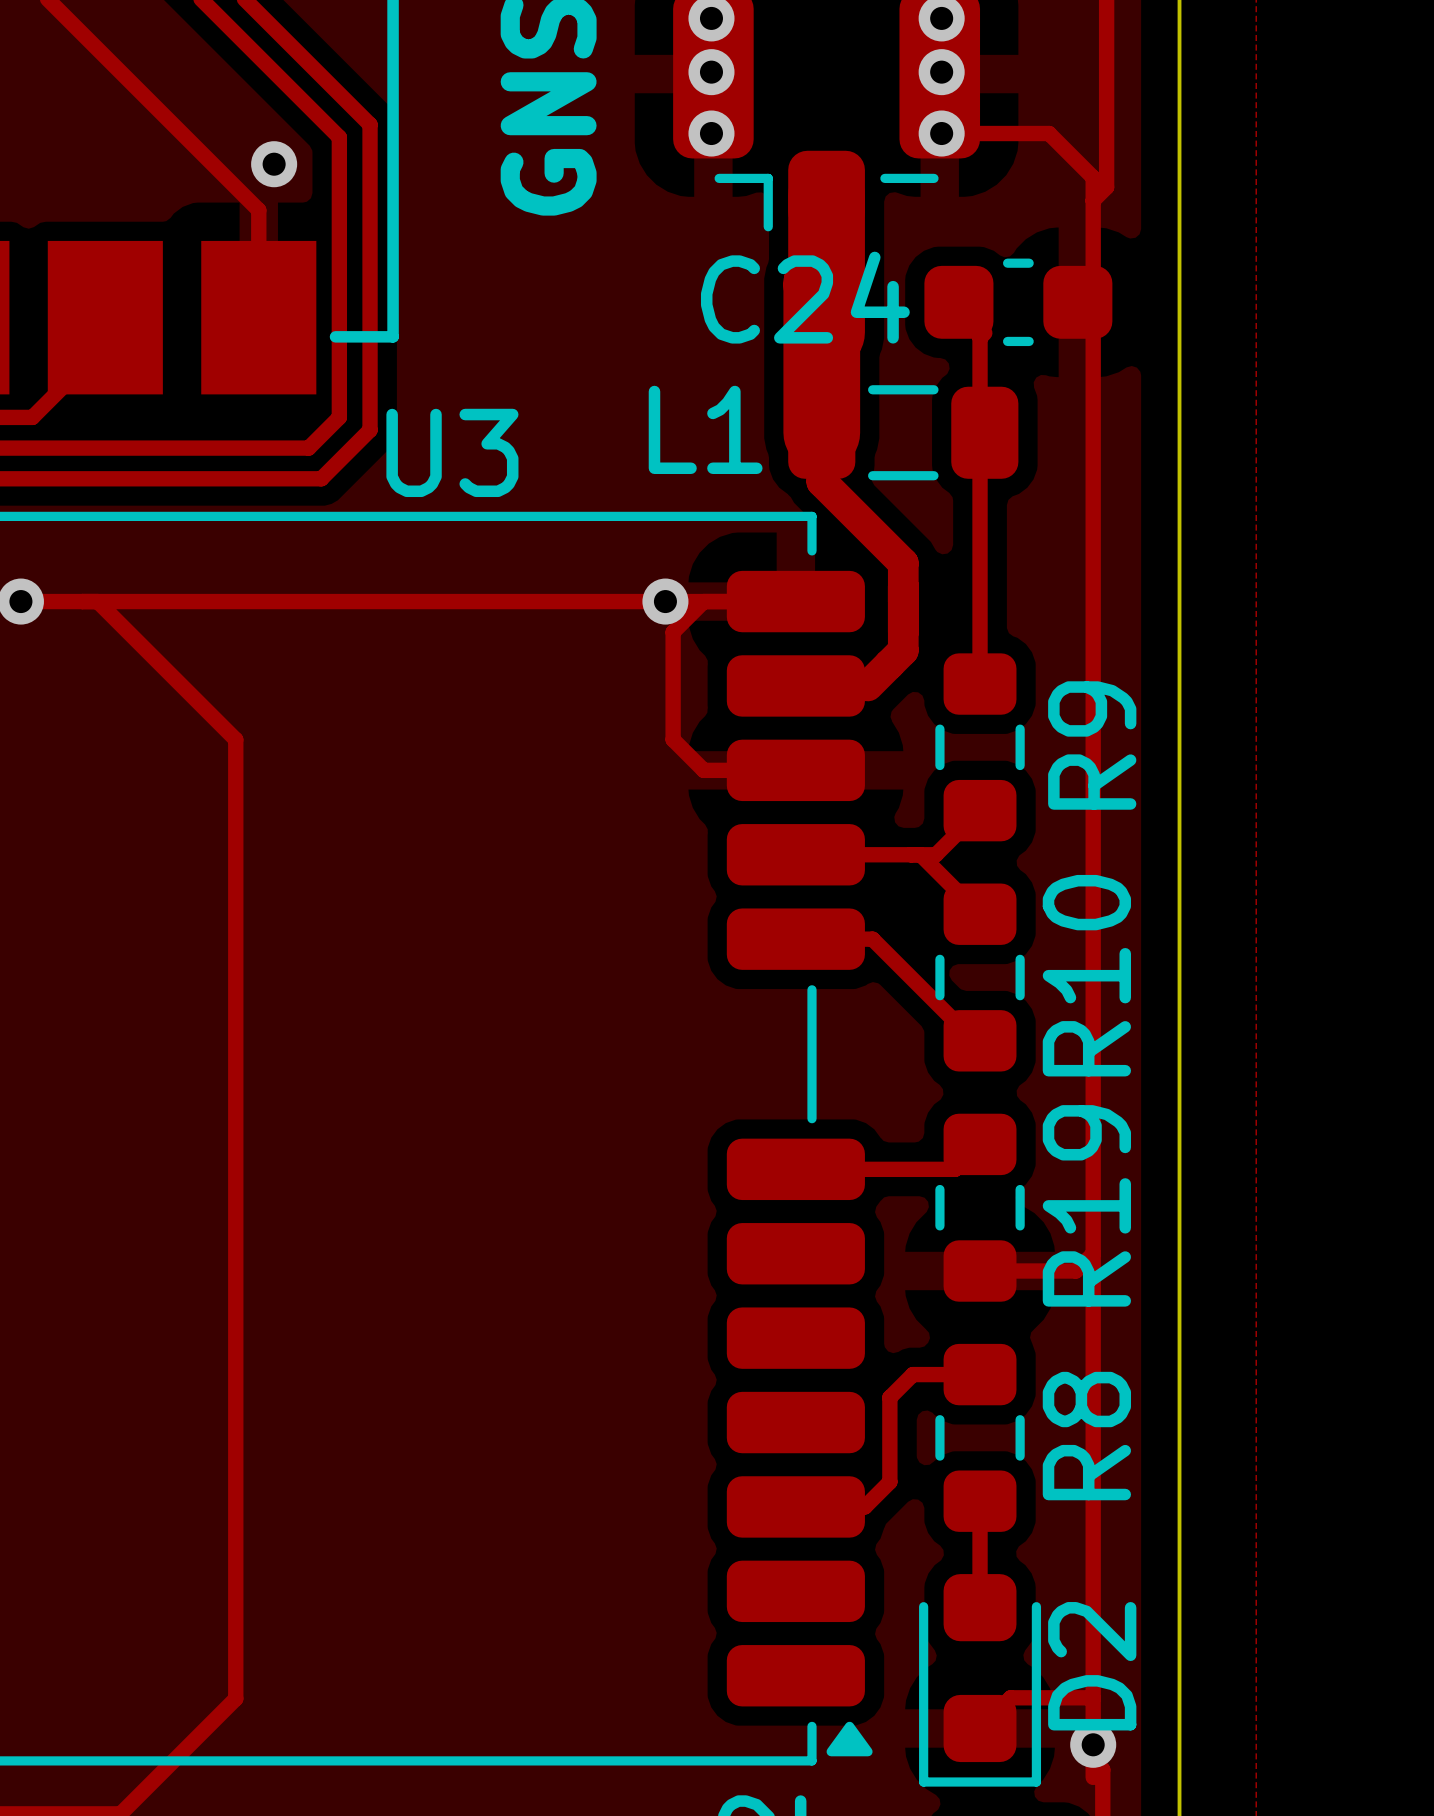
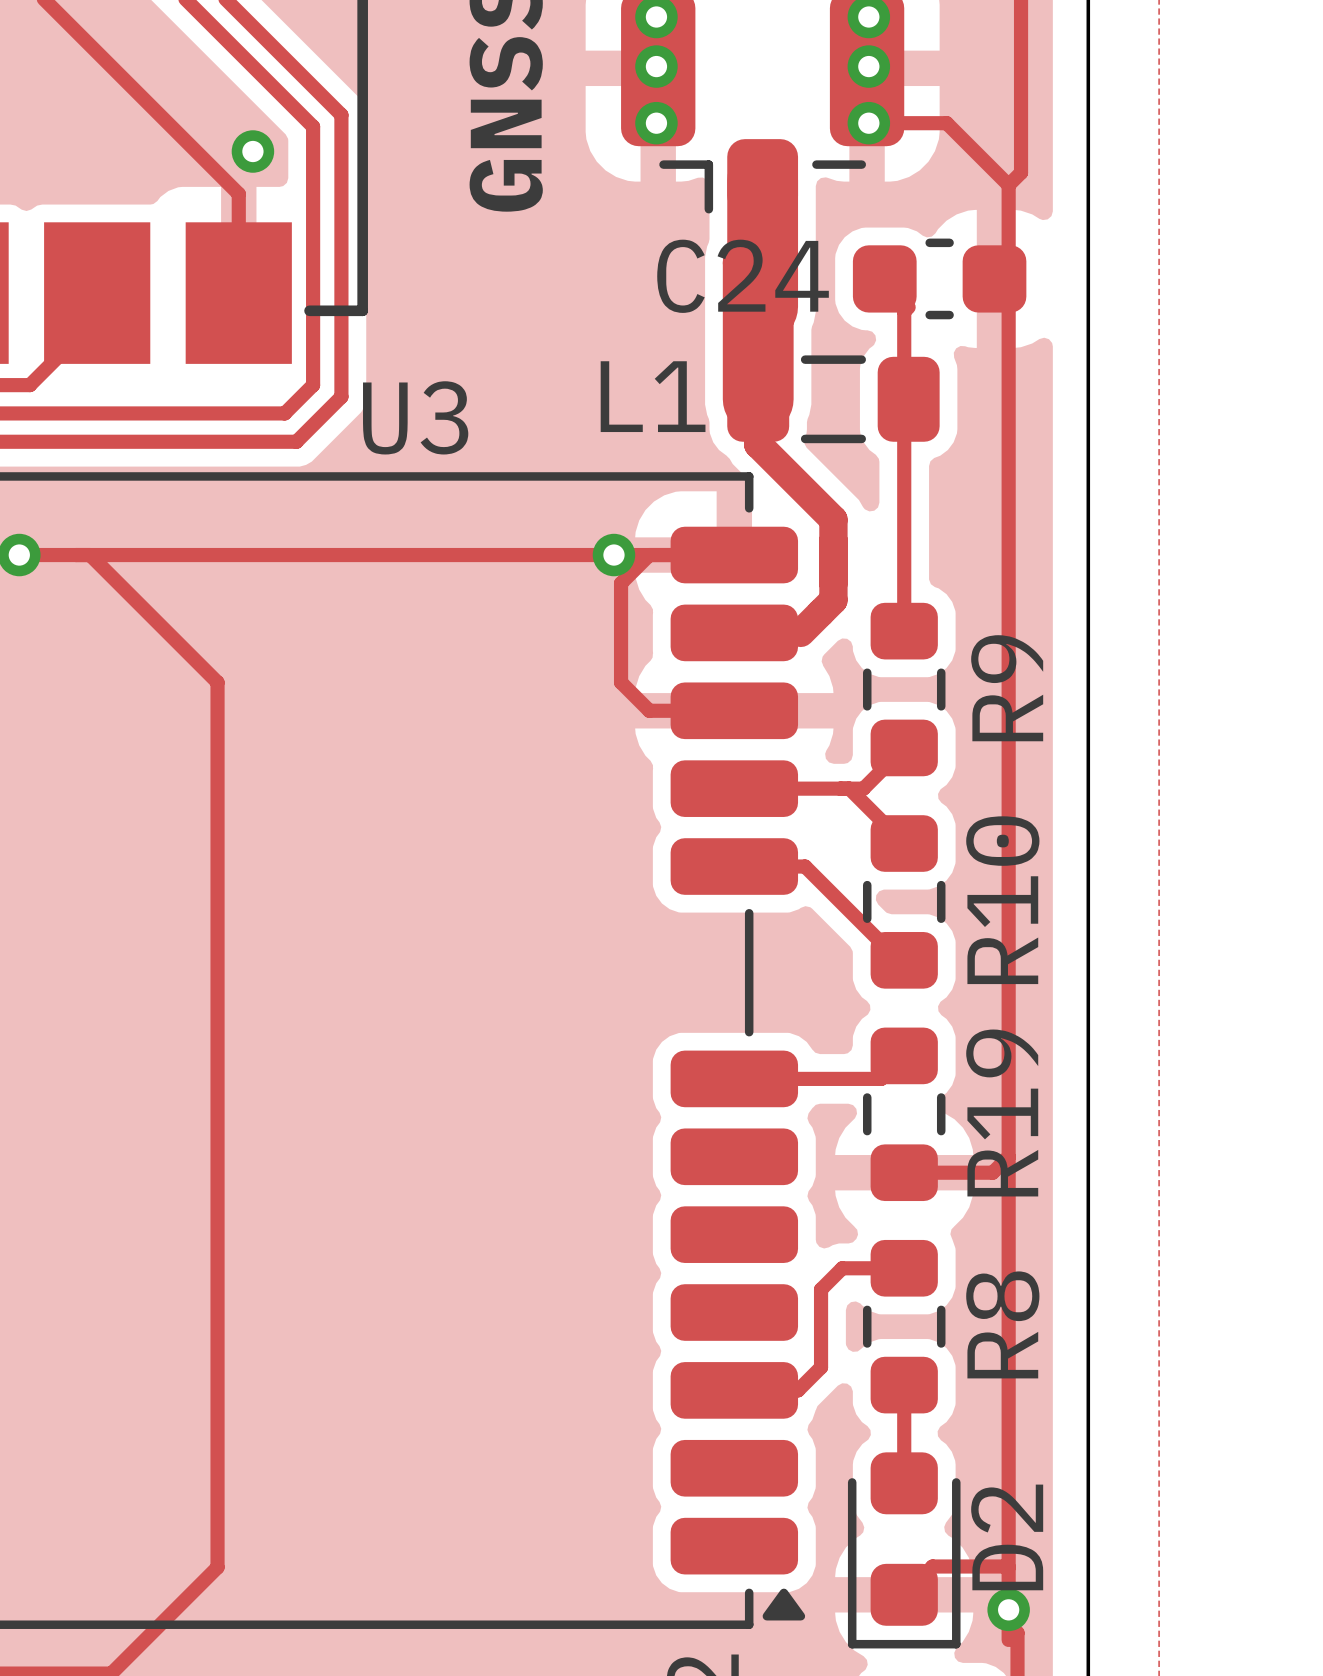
track: (1026, 133) (1049, 133) (1093, 177) (1093, 200) -> (946, 123) (1008, 185)

